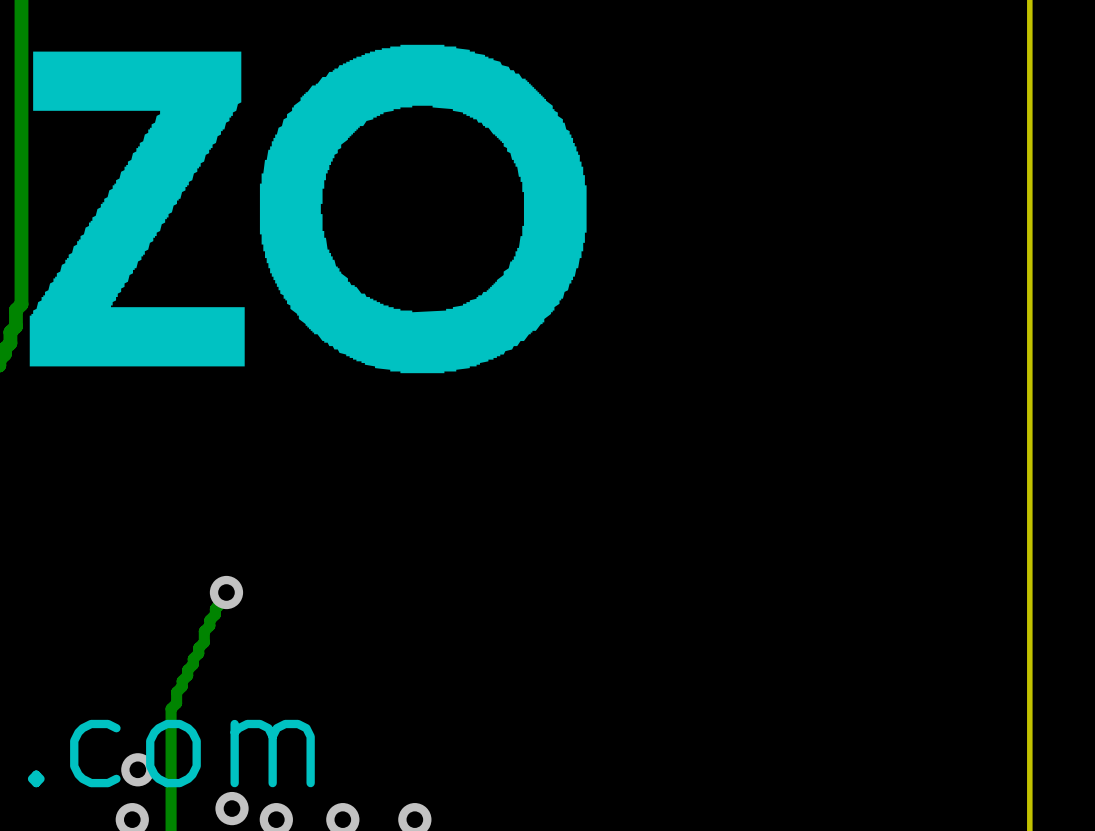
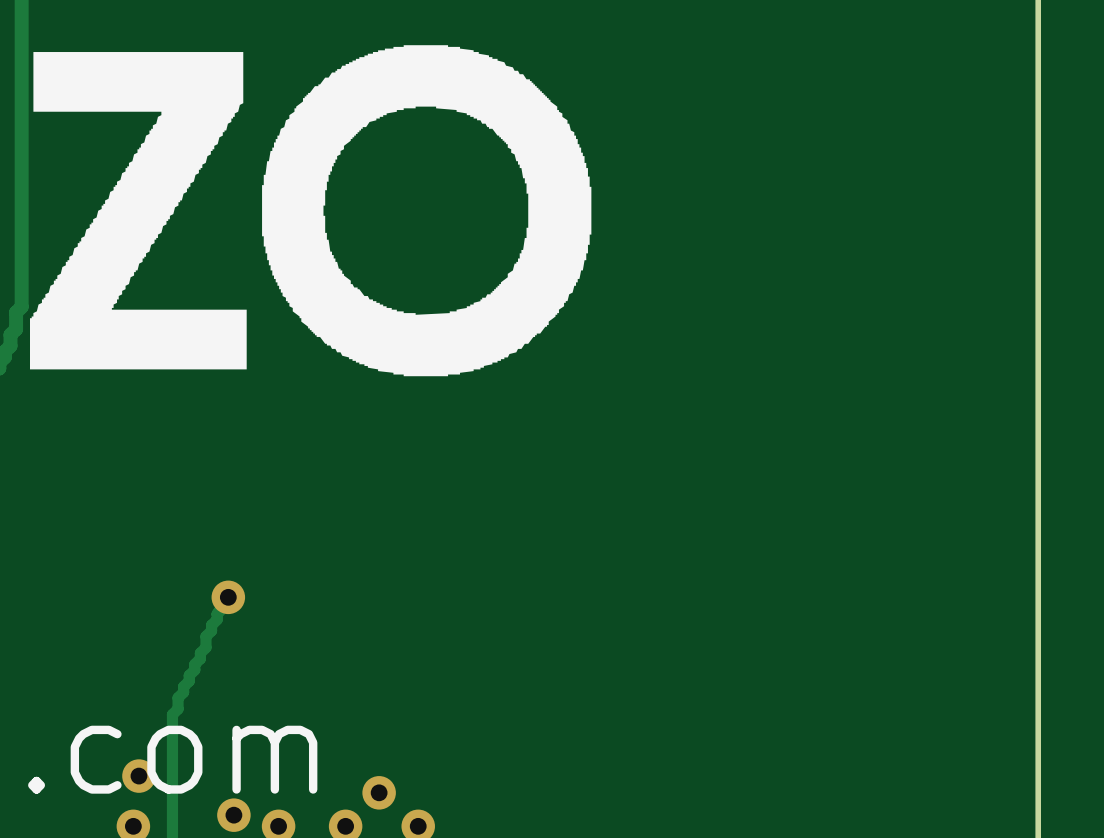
via: none -> (379, 792)

